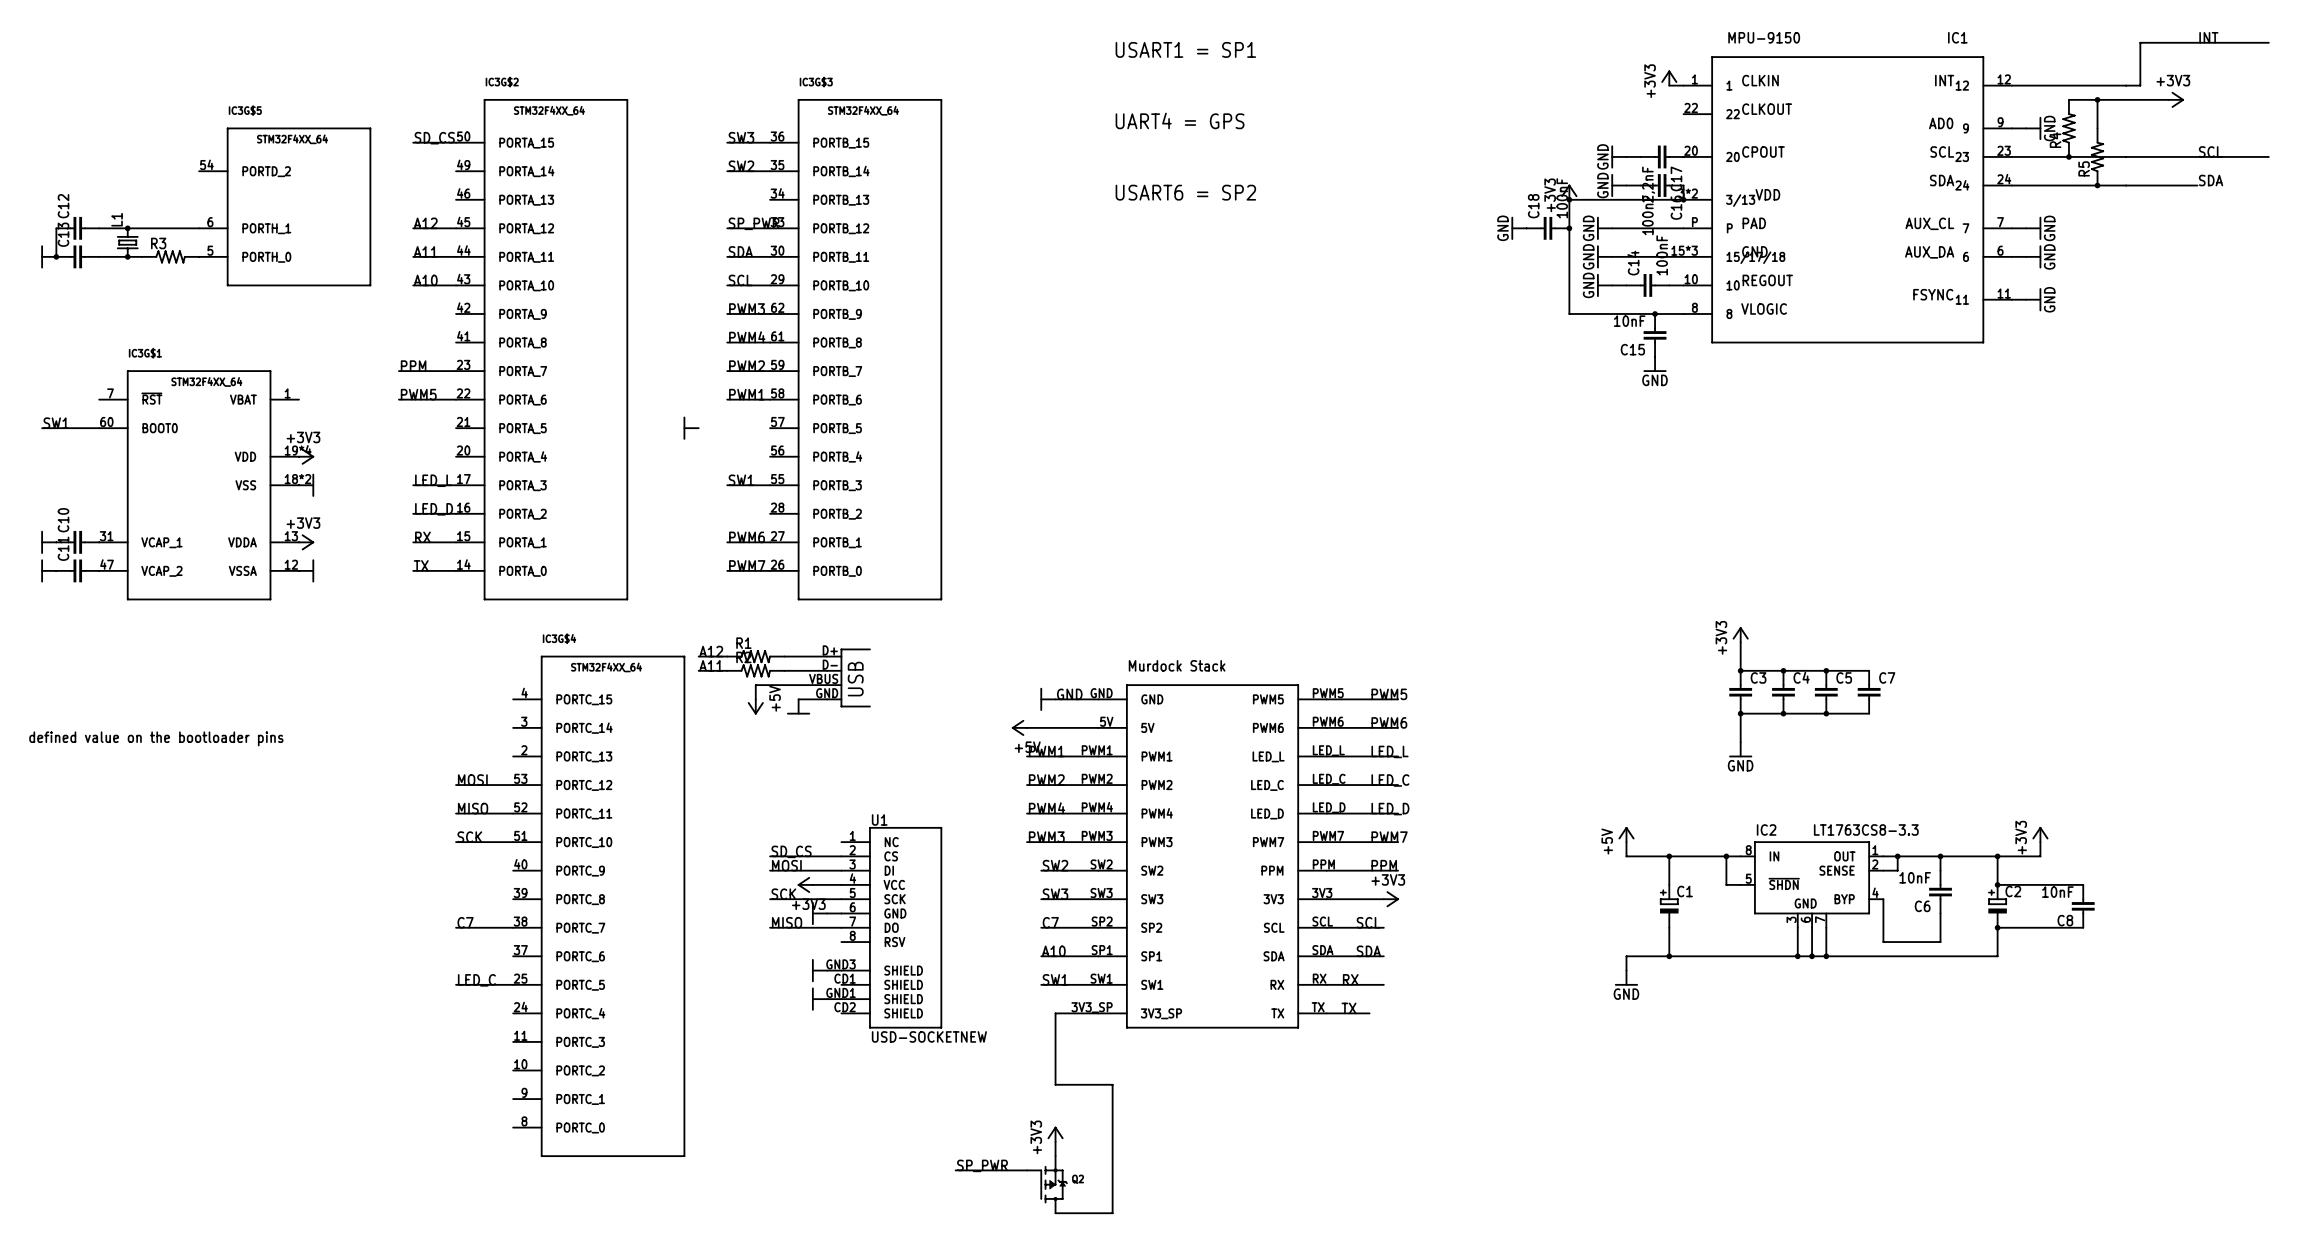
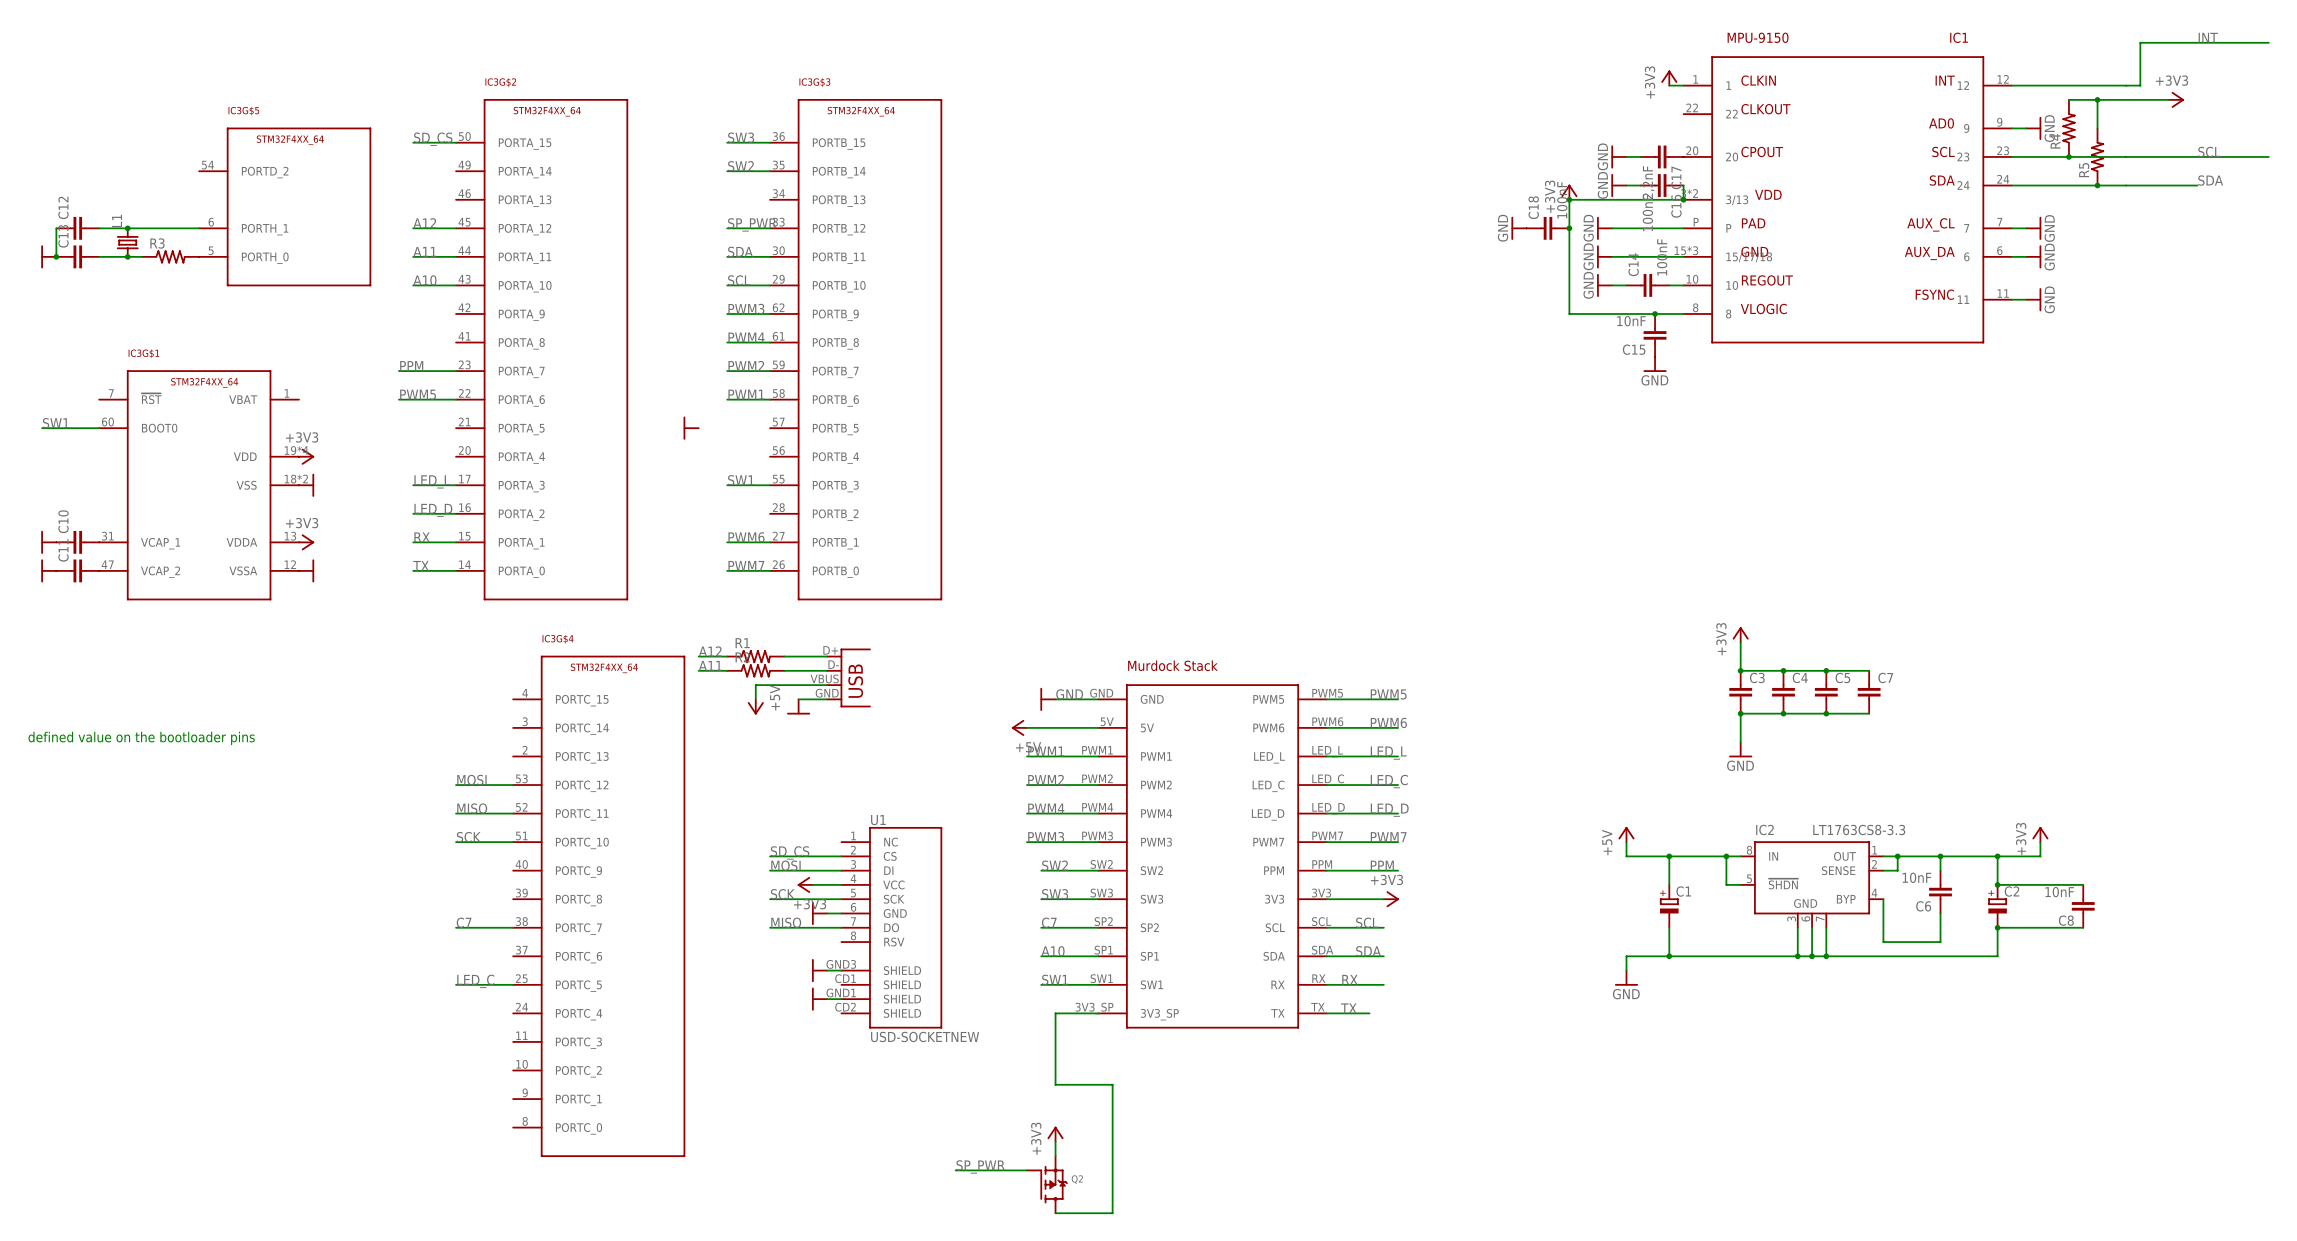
text: USART1 = SP1 (1185, 49) -> none
text: UART4 = GPS (1180, 120) -> none
text: USART6 = SP2 (1185, 192) -> none

